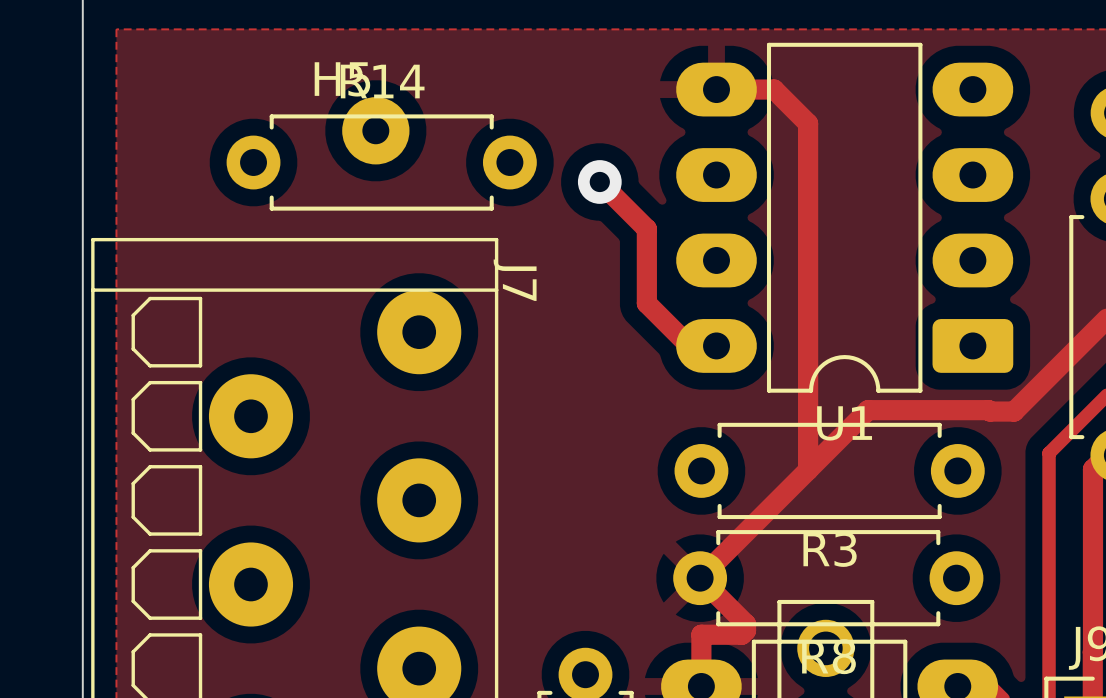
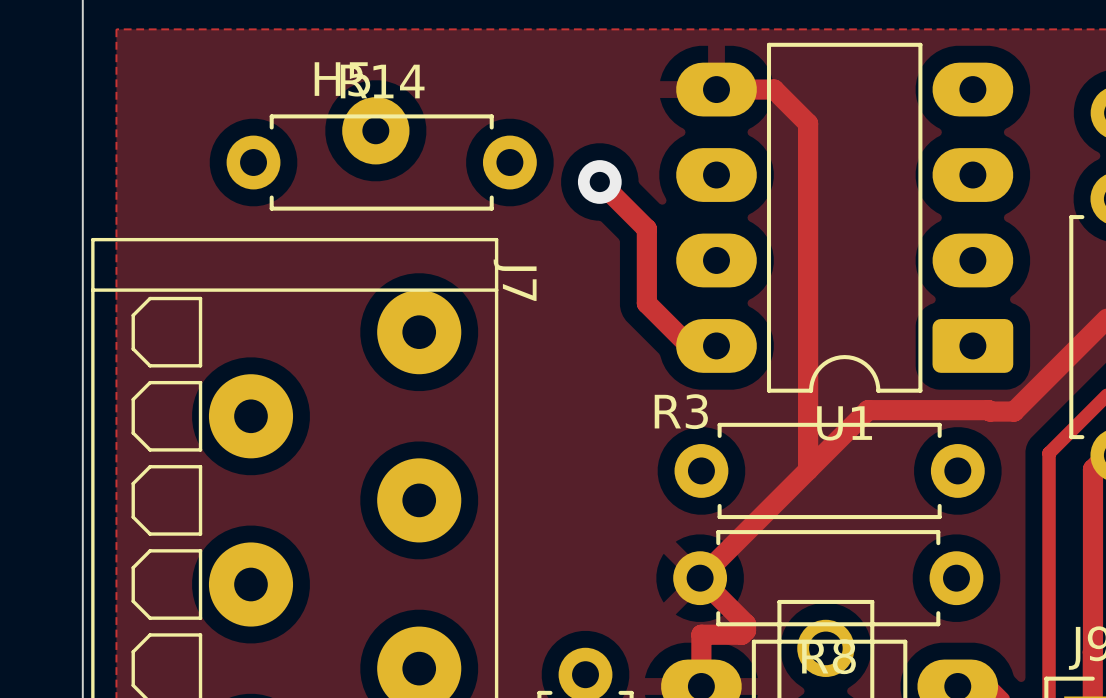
R3 name position: R3 (830, 549) -> R3 (681, 411)

